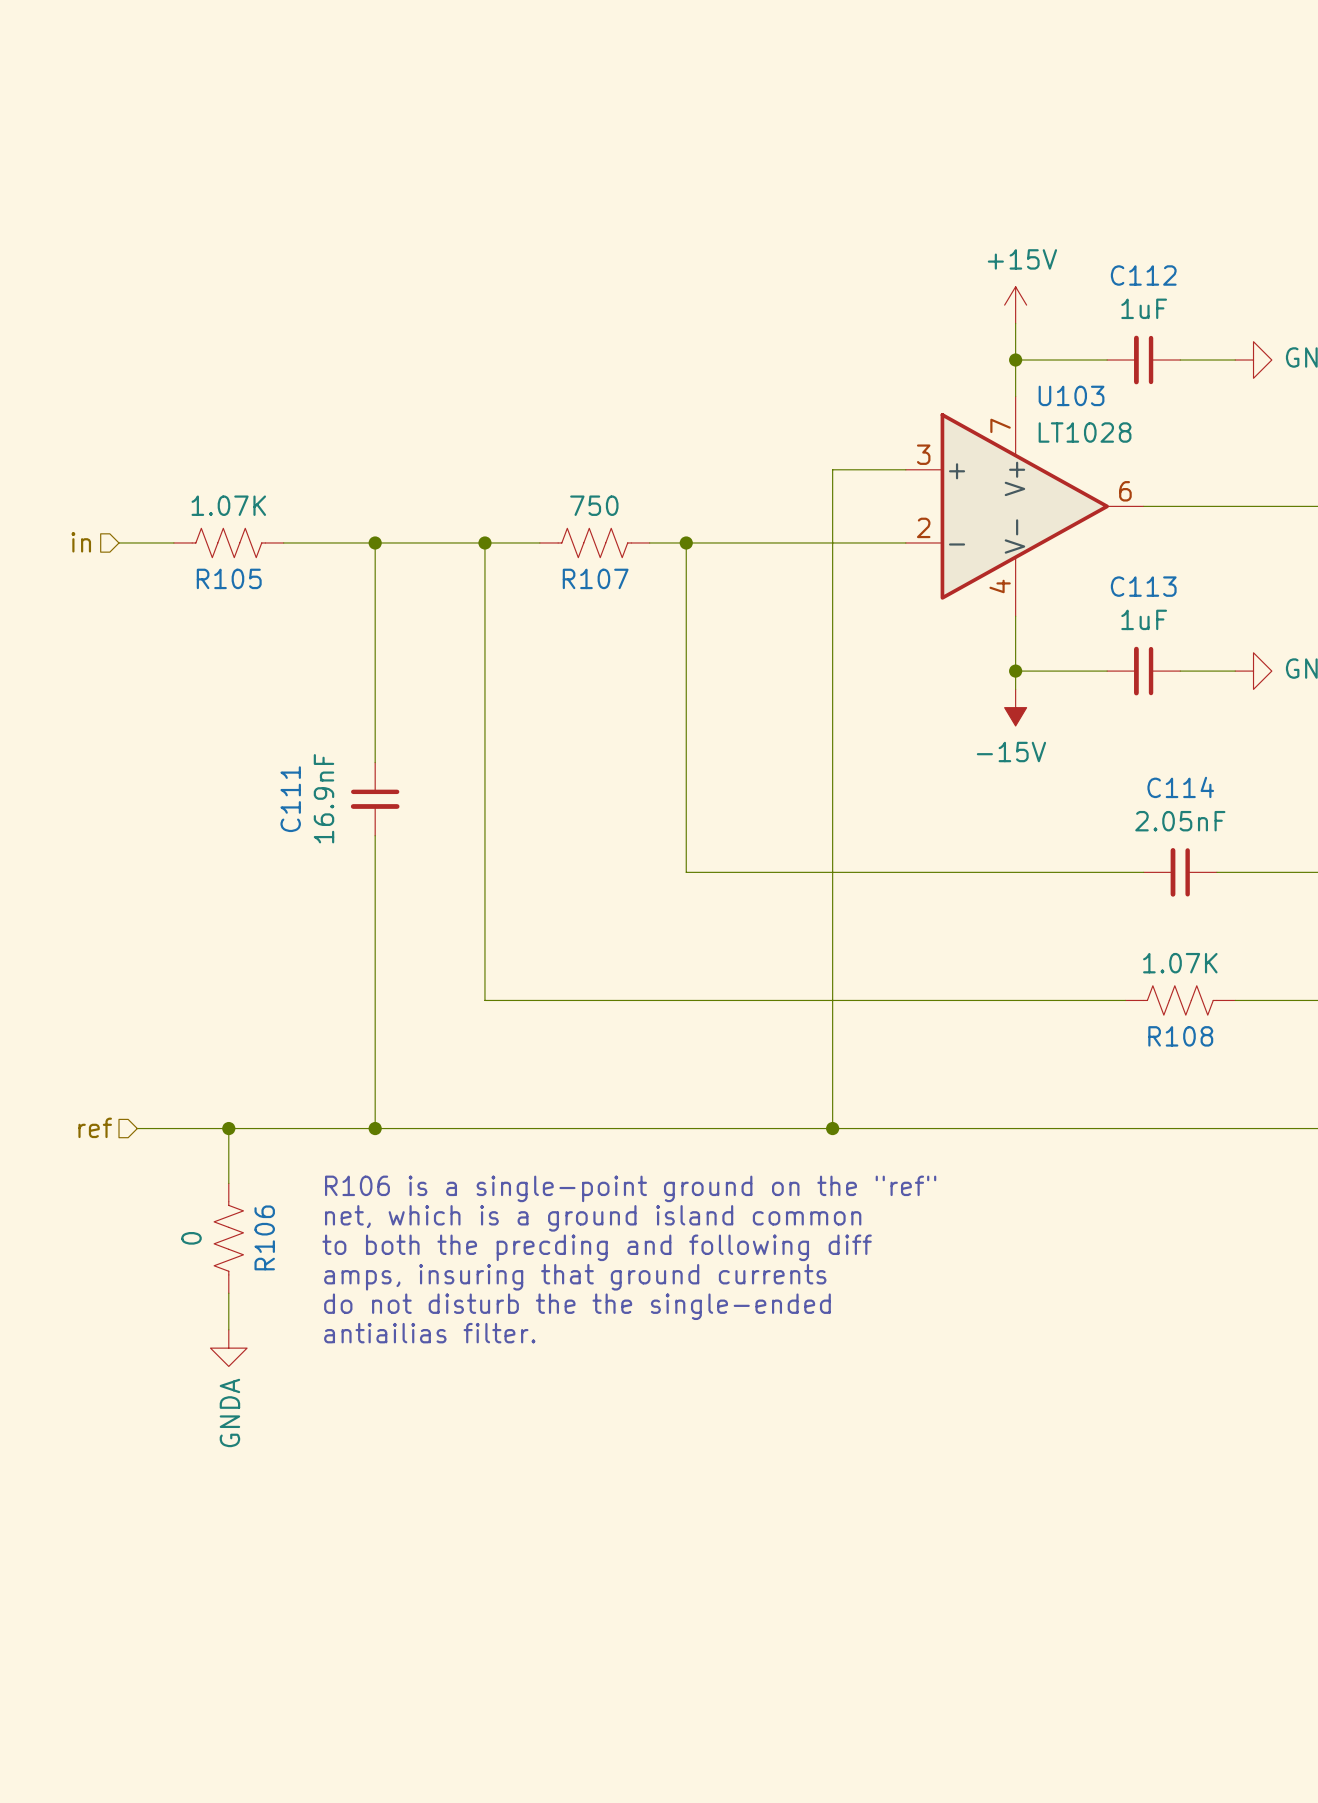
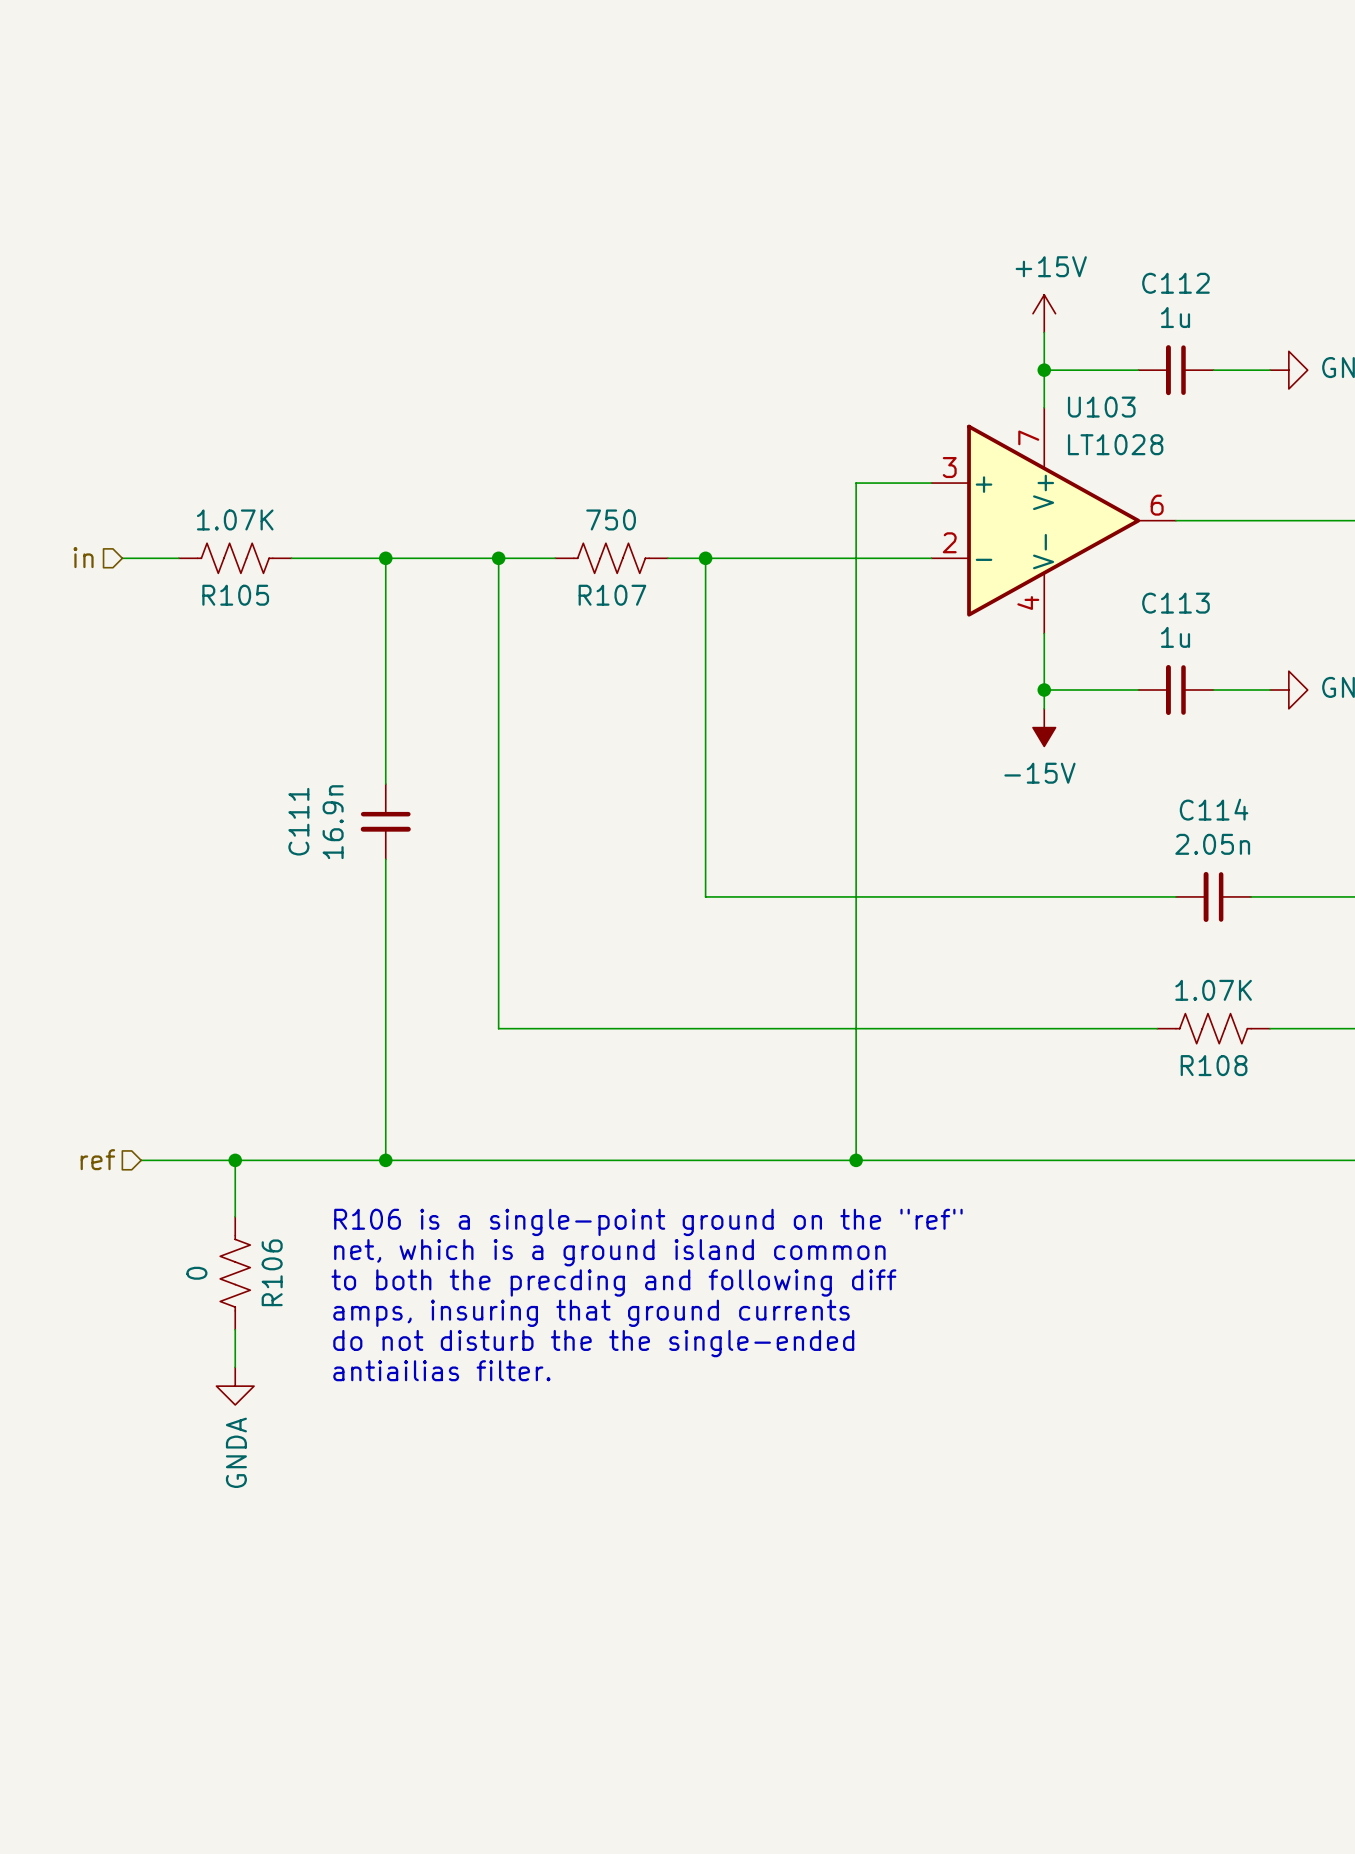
C112 value: 1uF (1144, 308) -> 1u (1175, 317)
C113 value: 1uF (1144, 619) -> 1u (1175, 637)
C111 value: 16.9nF (323, 798) -> 16.9n (333, 822)
C114 value: 2.05nF (1180, 821) -> 2.05n (1212, 844)

